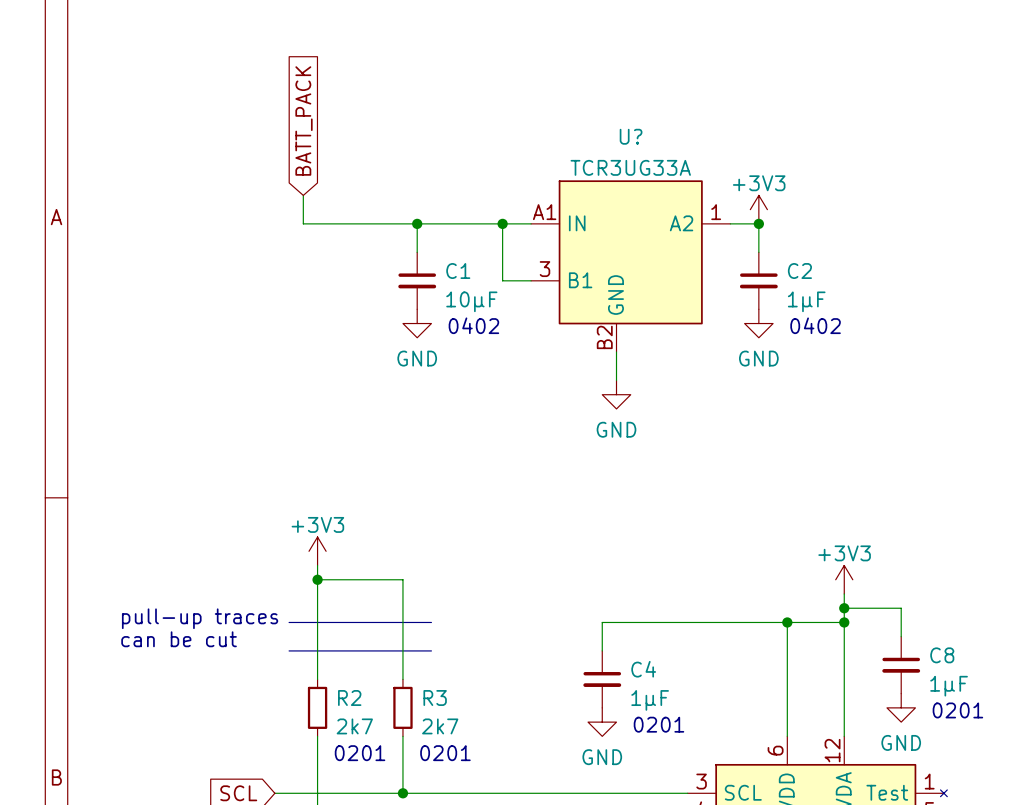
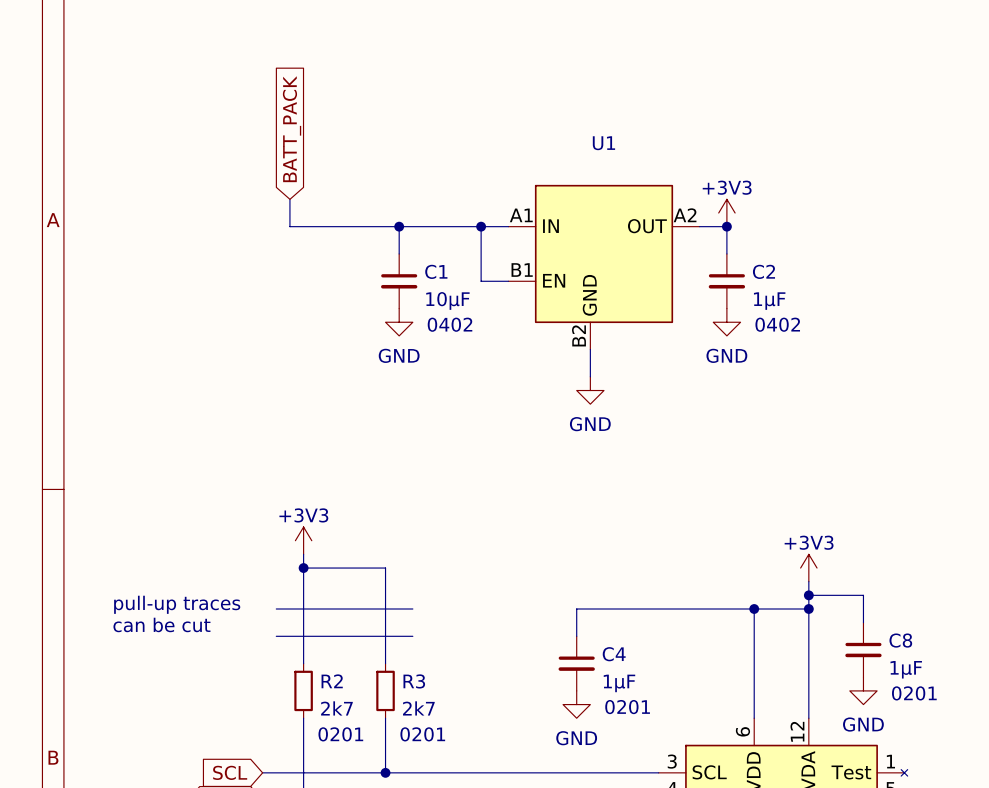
U? name: U? (631, 136) -> U1 (603, 143)
U? value: TCR3UG33A (630, 167) -> none
U? pin number: 1 (716, 212) -> A2 (685, 215)
U? pin name: A2 (681, 223) -> OUT (647, 226)
U? pin number: 3 (544, 269) -> B1 (522, 270)
U? pin name: B1 (580, 280) -> EN (554, 280)

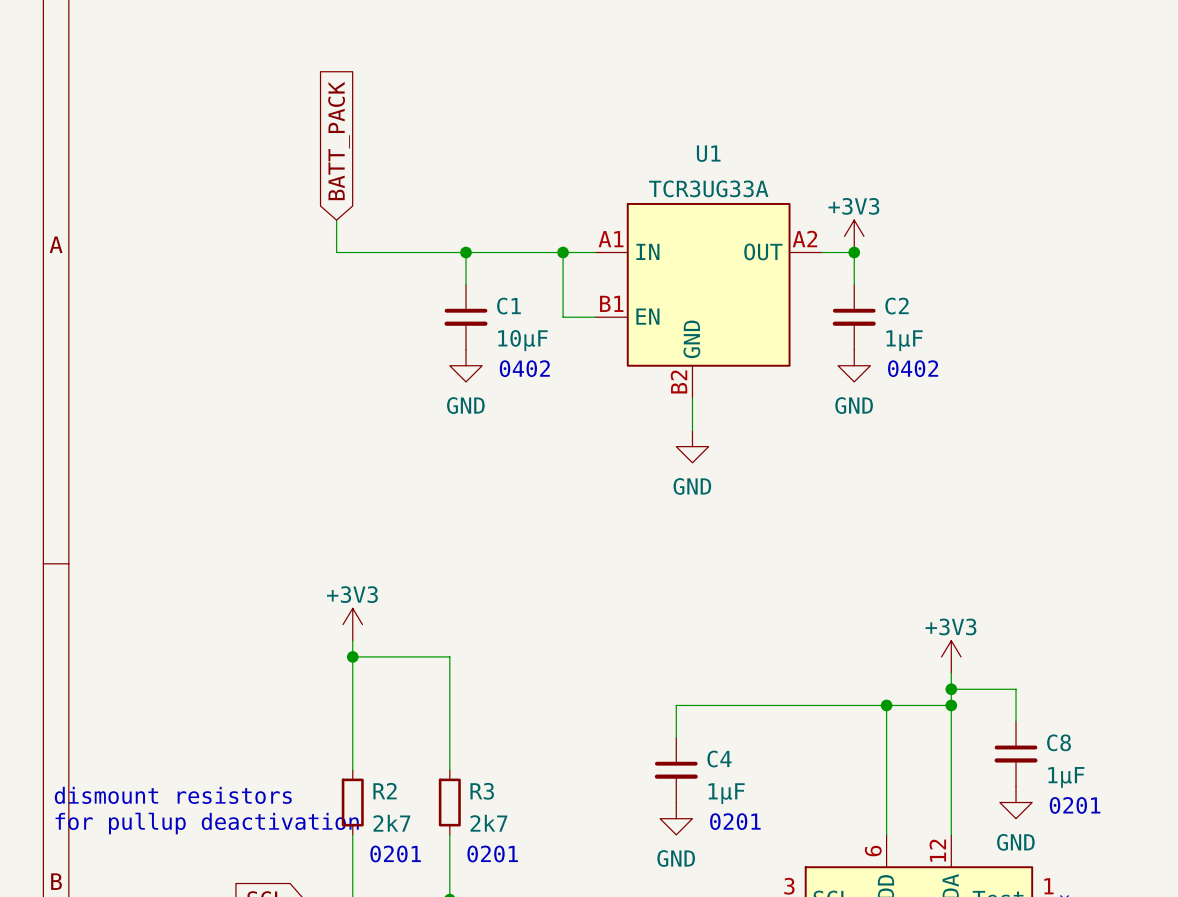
U1 value: none -> TCR3UG33A (708, 188)
text: pull-up traces (177, 604) -> none
line: (276, 608) (412, 608) -> none
text: can be cut (161, 624) -> none
line: (276, 636) (412, 636) -> none
text: none -> dismount resistors (173, 795)
text: none -> for pullup deactivation (207, 823)

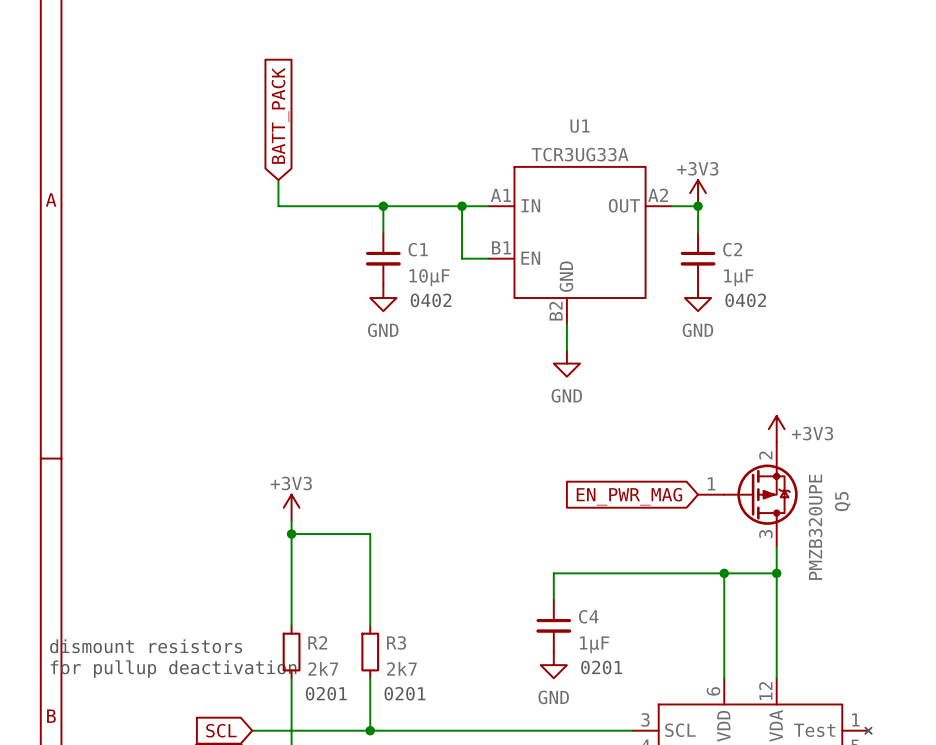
Q5: none -> PMZB320UPE (747, 494)
global label: none -> EN_PWR_MAG (629, 496)
power symbol text position: +3V3 (950, 626) -> +3V3 (812, 433)
power symbol position: +3V3 (951, 656) -> +3V3 (776, 429)
wire: (951, 689) (1016, 689) (1016, 721) -> none
junction: (951, 689) -> none
C8: 1µF (1016, 753) -> none
power symbol: GND (1016, 802) -> none
text: 0201 (1075, 805) -> none

